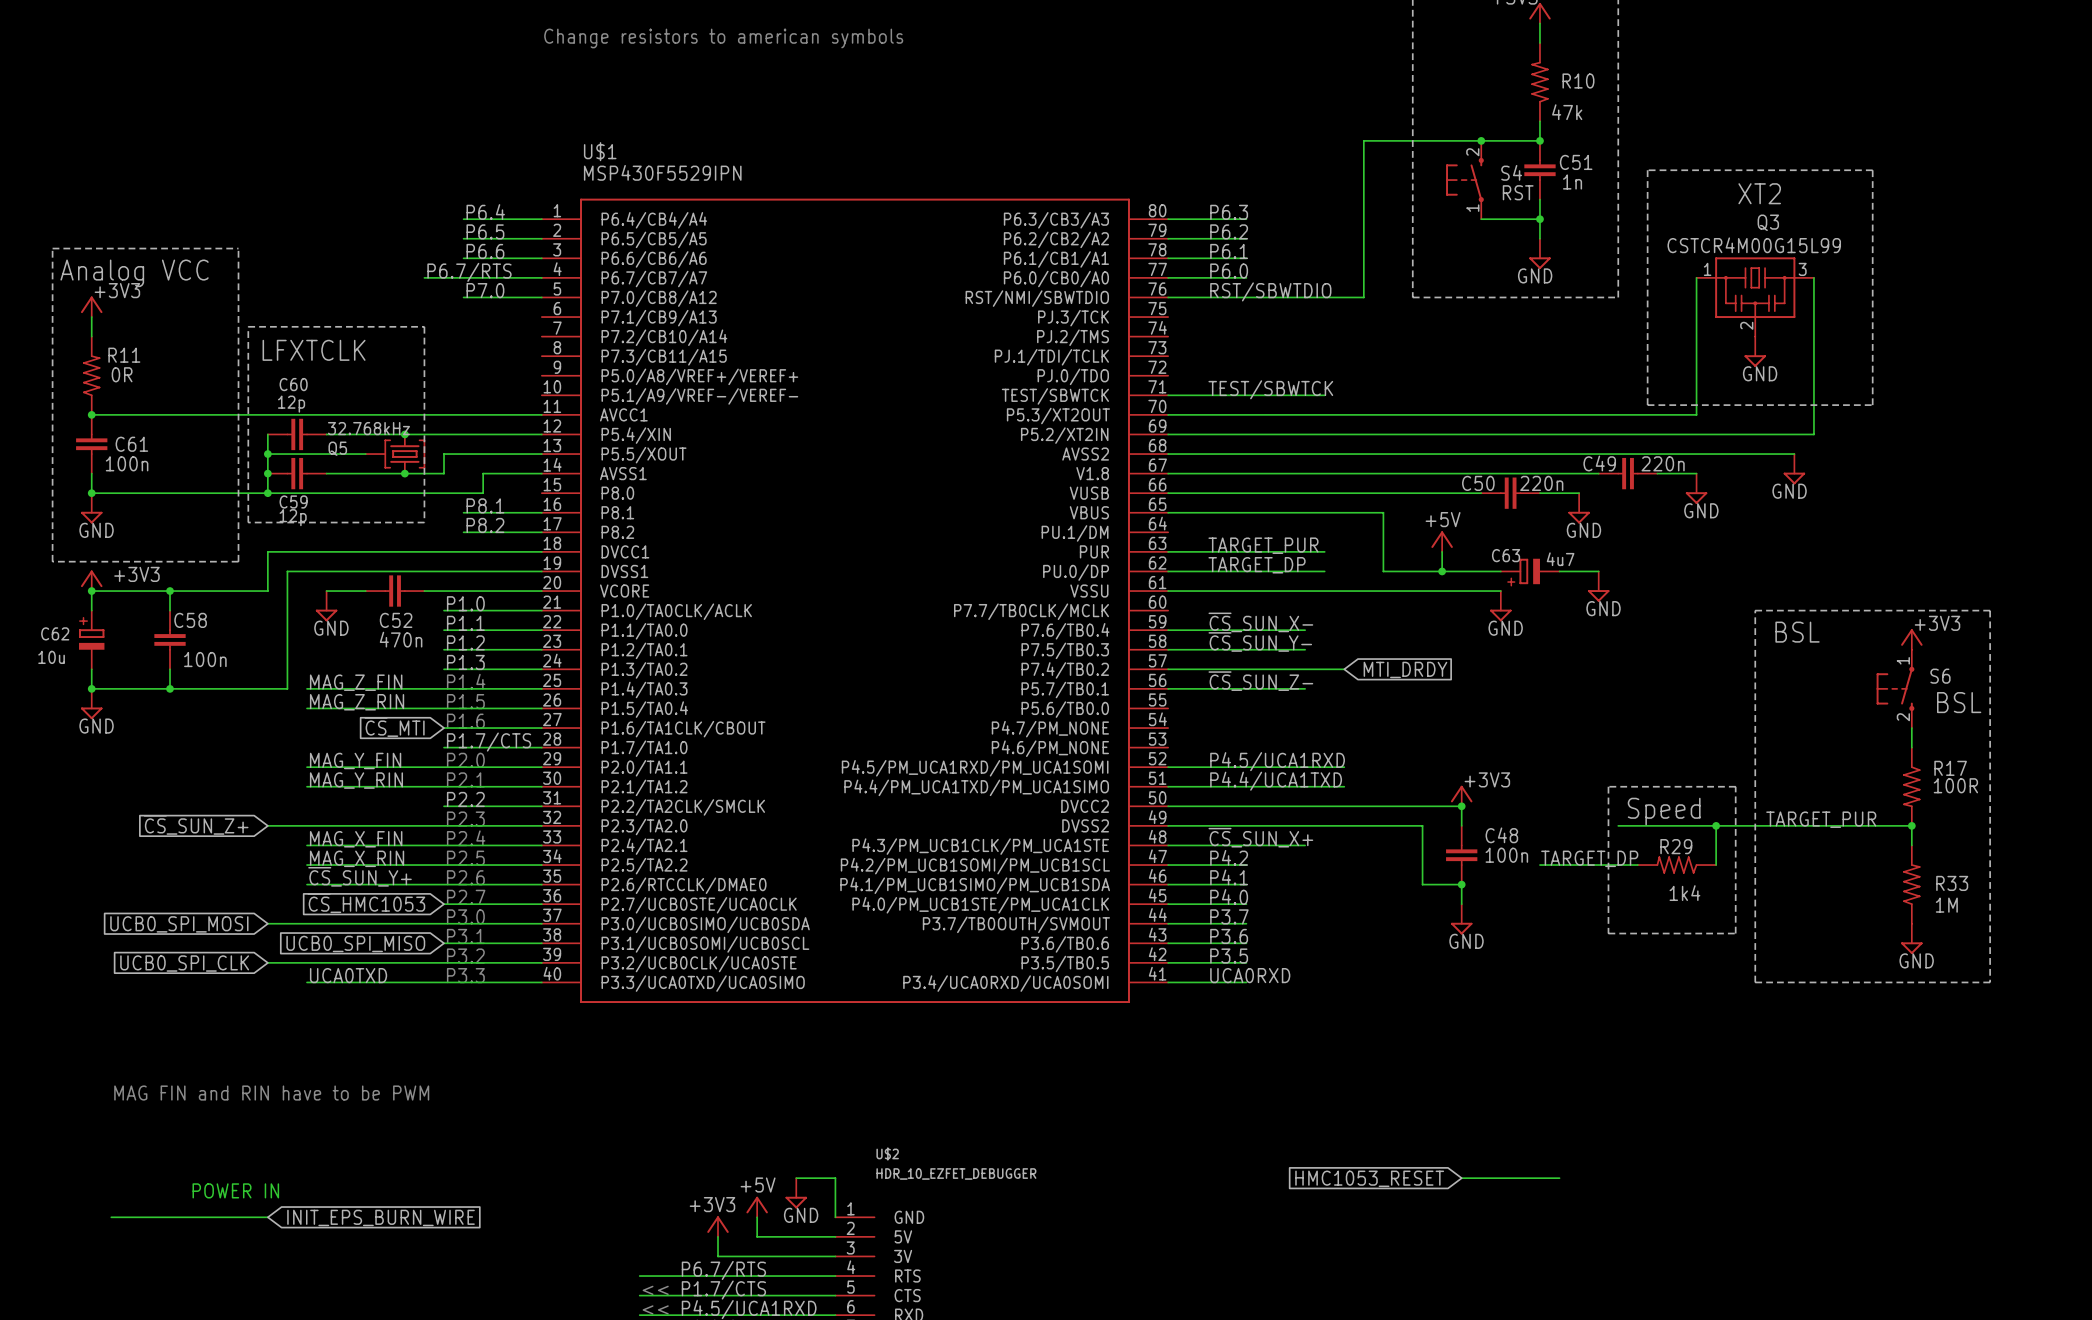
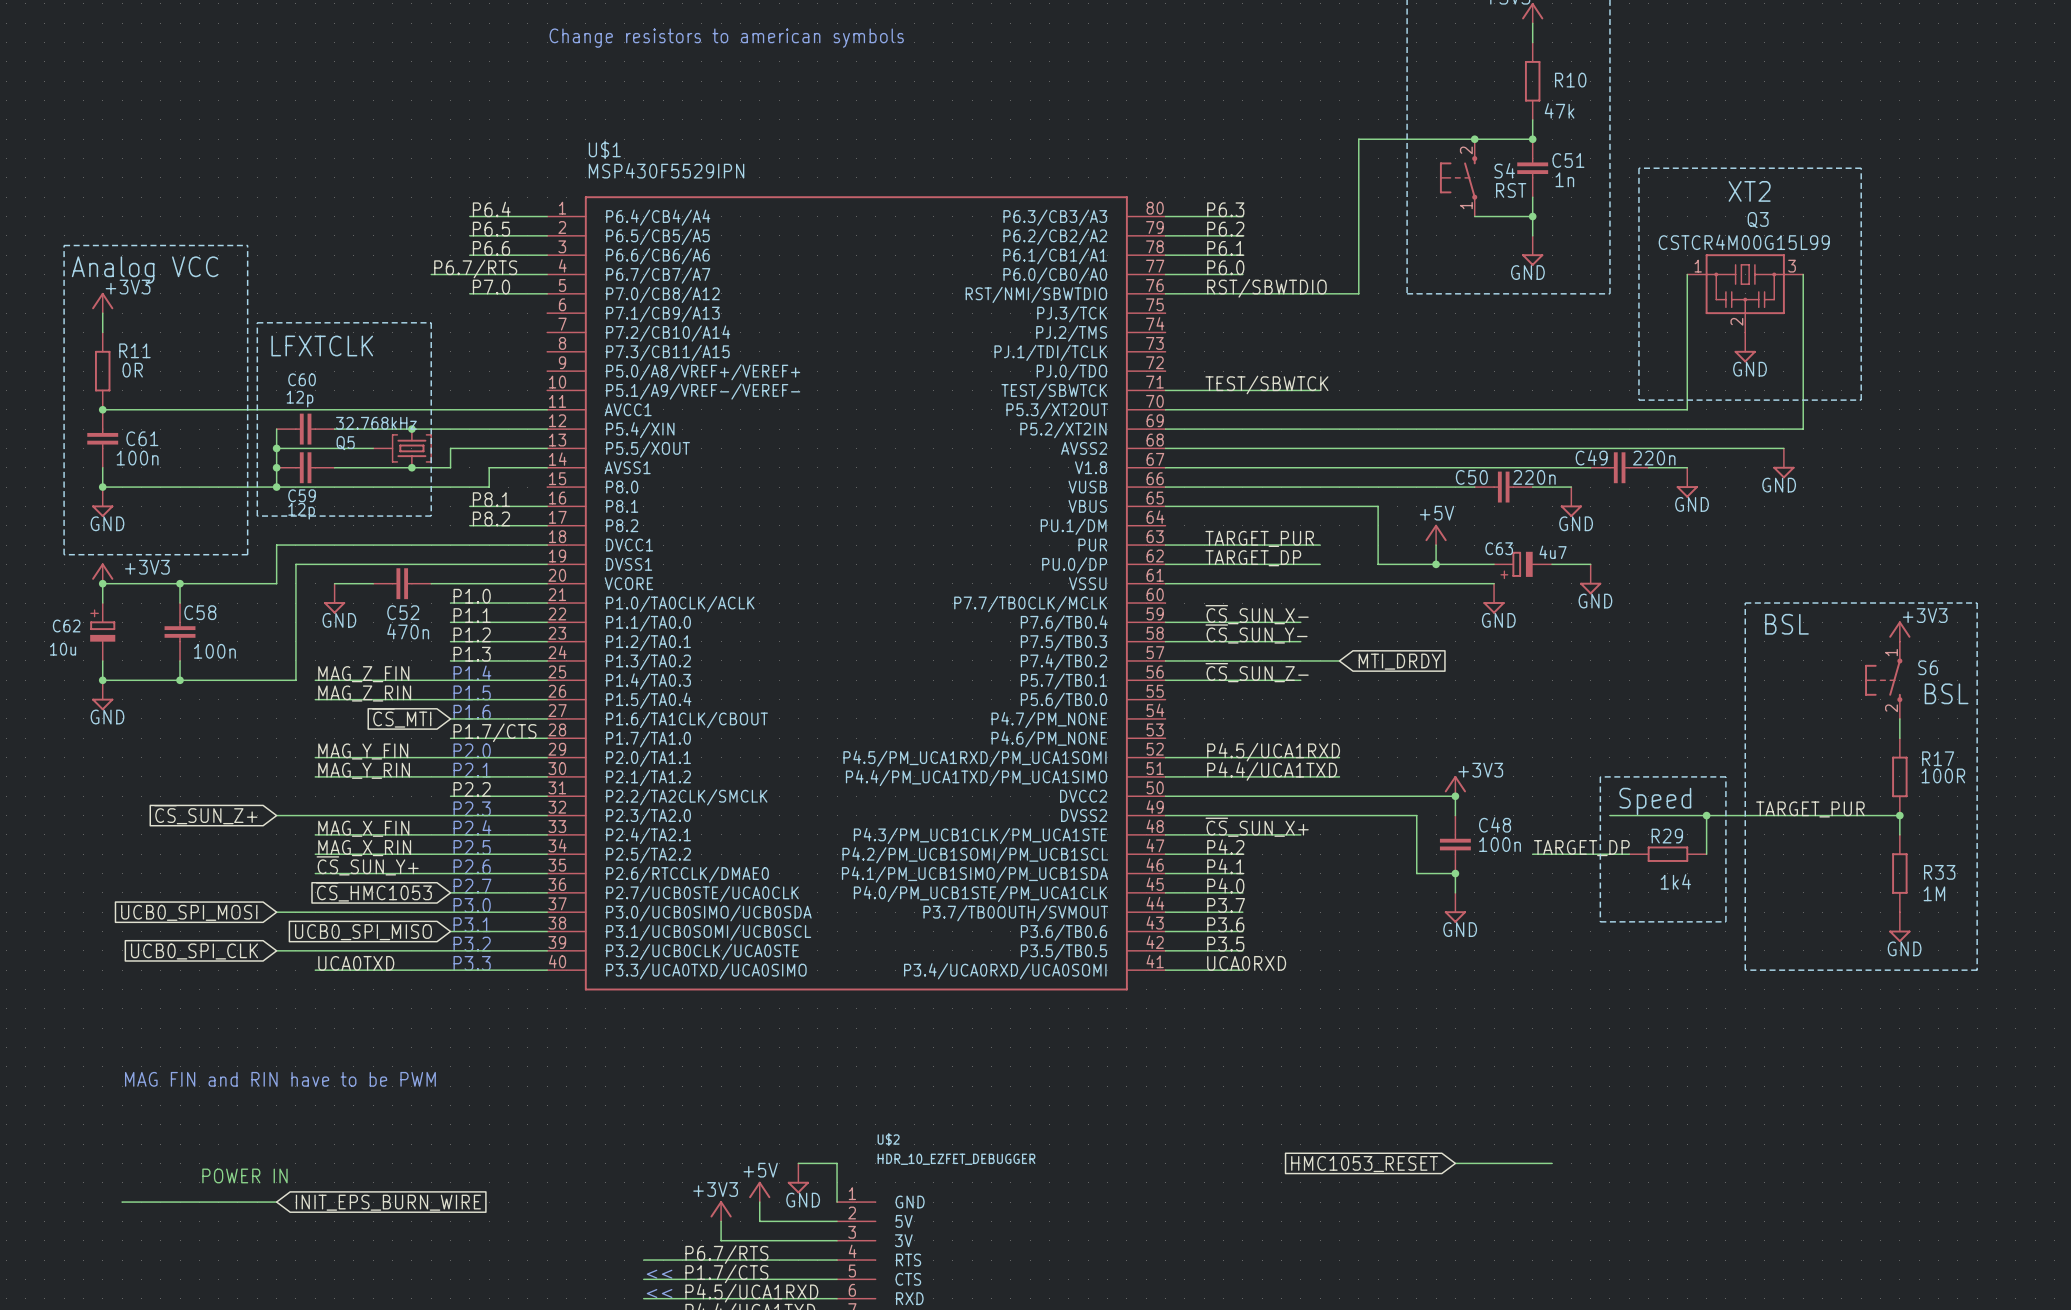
R10 symbol: [1531, 43, 1549, 122] -> [1524, 42, 1541, 120]
R11 symbol: [83, 336, 101, 415] -> [94, 332, 111, 410]
R17 symbol: [1903, 747, 1921, 826] -> [1892, 738, 1908, 816]
R33 symbol: [1903, 845, 1921, 924] -> [1892, 834, 1908, 913]
R29 symbol: [1637, 856, 1717, 874] -> [1629, 846, 1707, 862]

